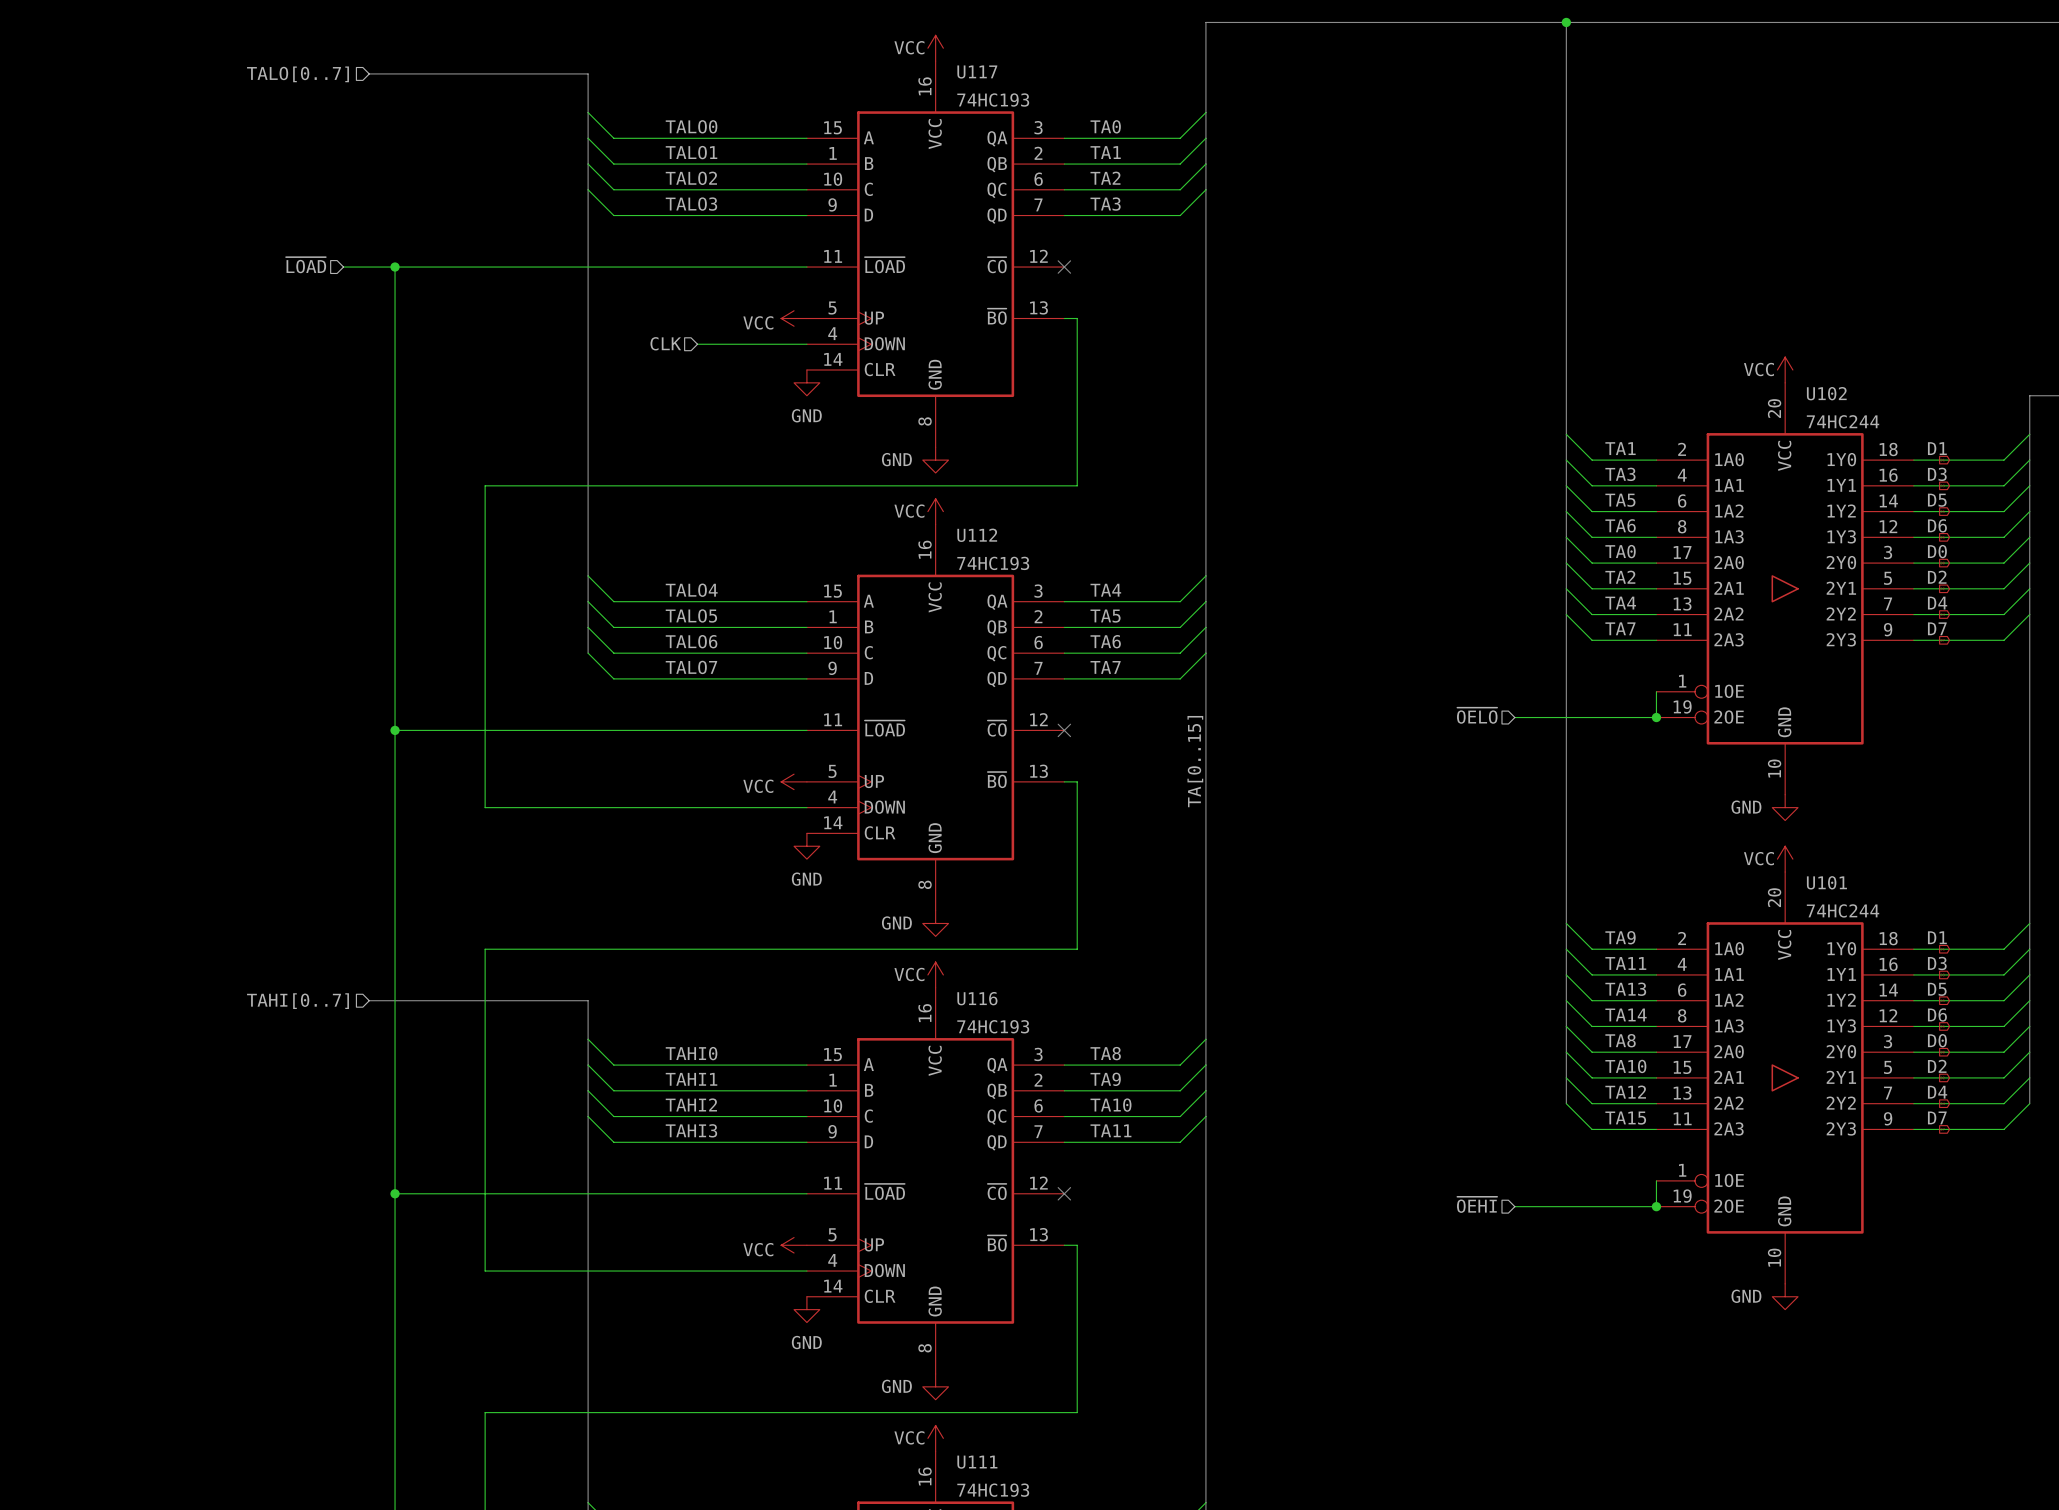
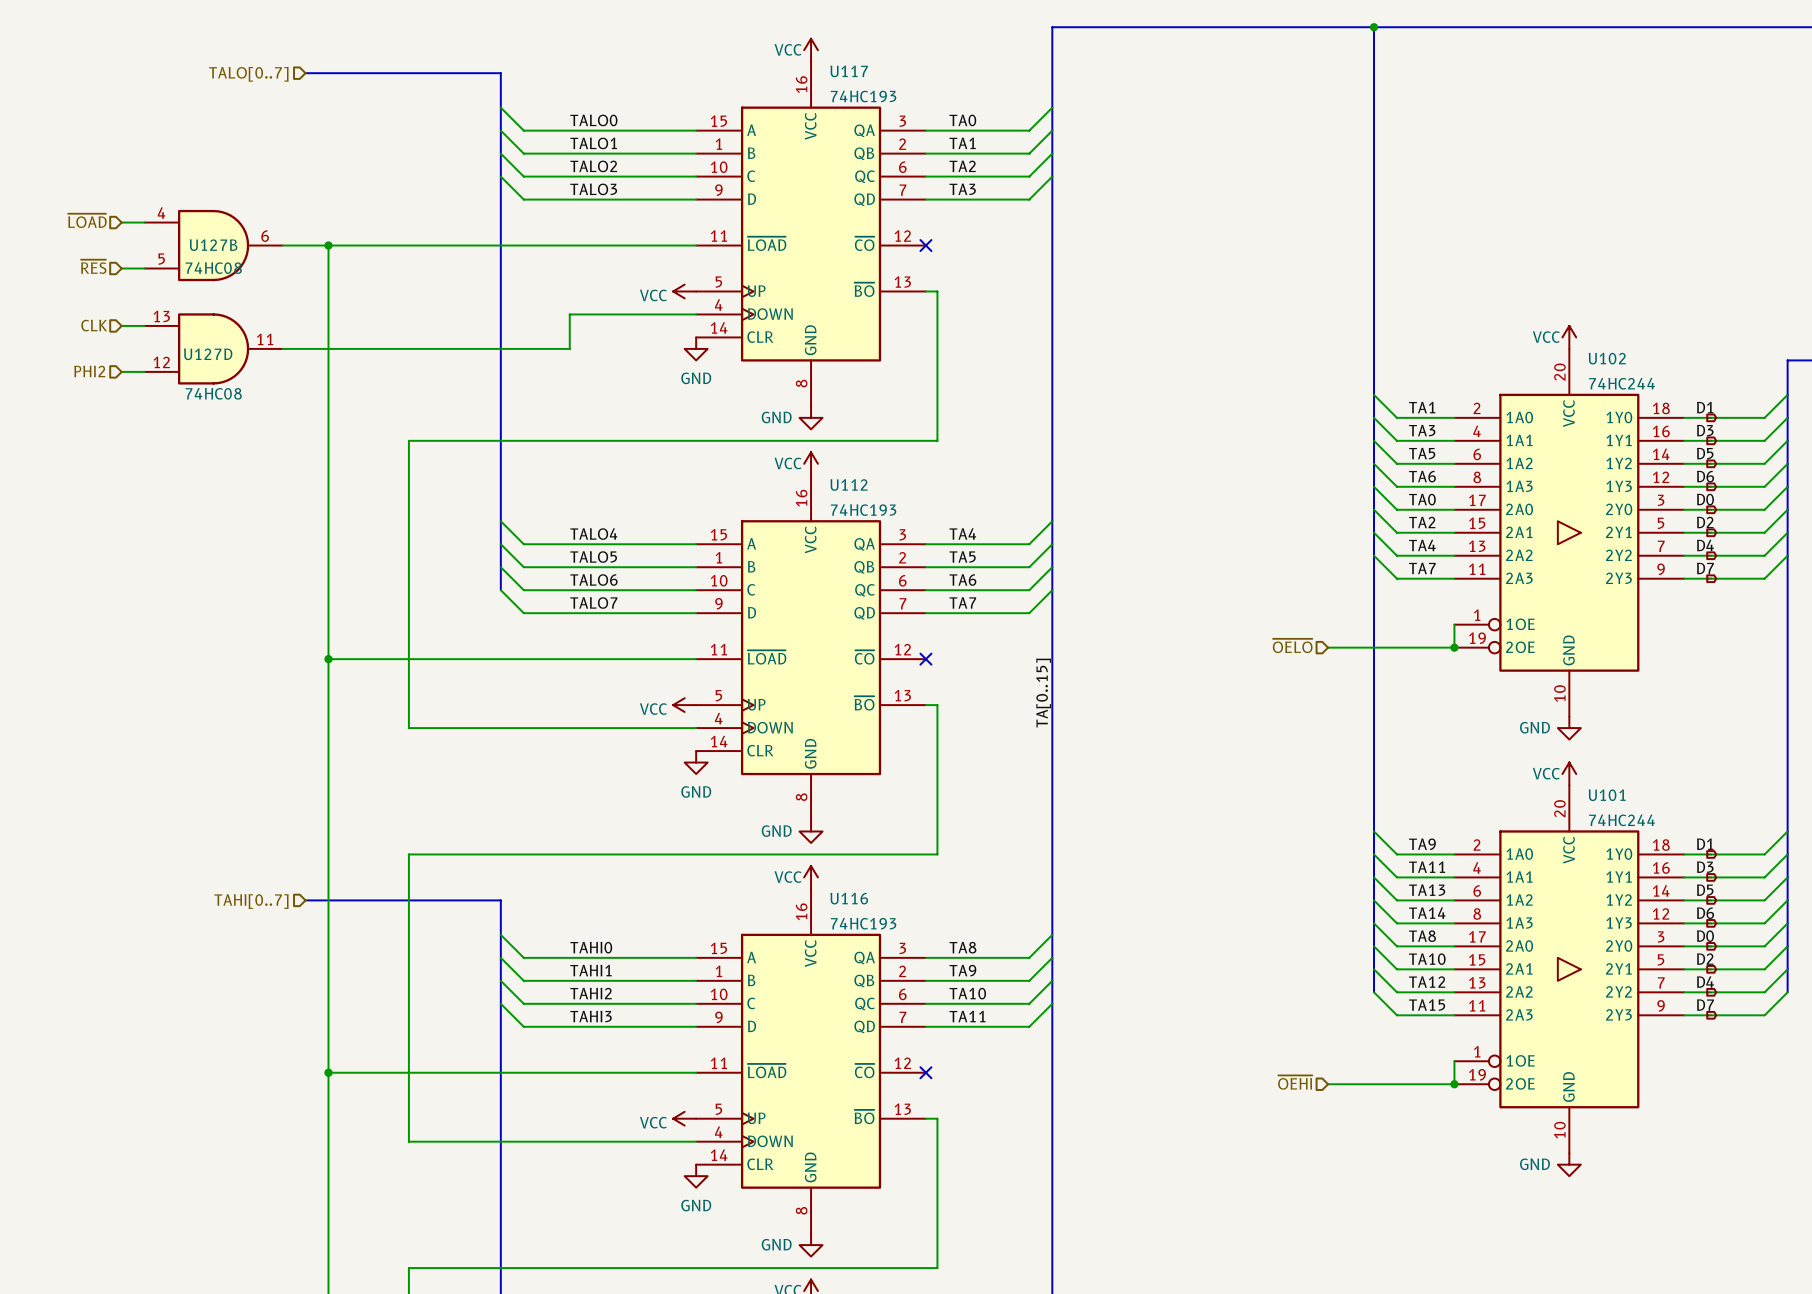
wire: none -> (121, 222) (144, 222)
hierarchical label position: ~{LOAD} (306, 265) -> ~{LOAD} (87, 220)
U127B: none -> 74HC08 (213, 245)
hierarchical label: none -> ~{RES} (93, 266)
wire: none -> (121, 268) (144, 268)
hierarchical label: CLK (665, 343) -> none
wire: none -> (598, 314) (569, 314) (569, 348) (282, 348)
hierarchical label: none -> CLK (94, 325)
wire: none -> (121, 325) (144, 325)
U127D: none -> 74HC08 (213, 348)
hierarchical label: none -> PHI2 (89, 371)
wire: none -> (121, 371) (144, 371)

